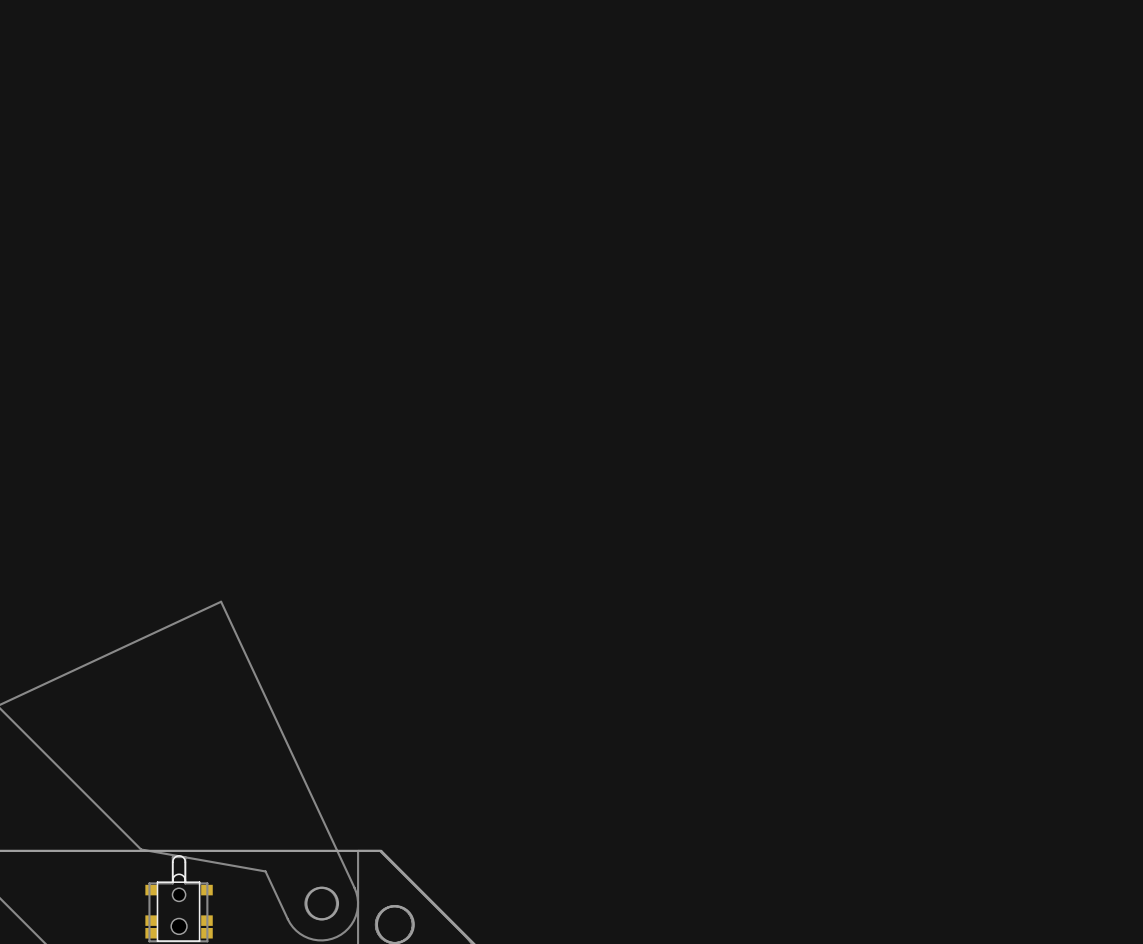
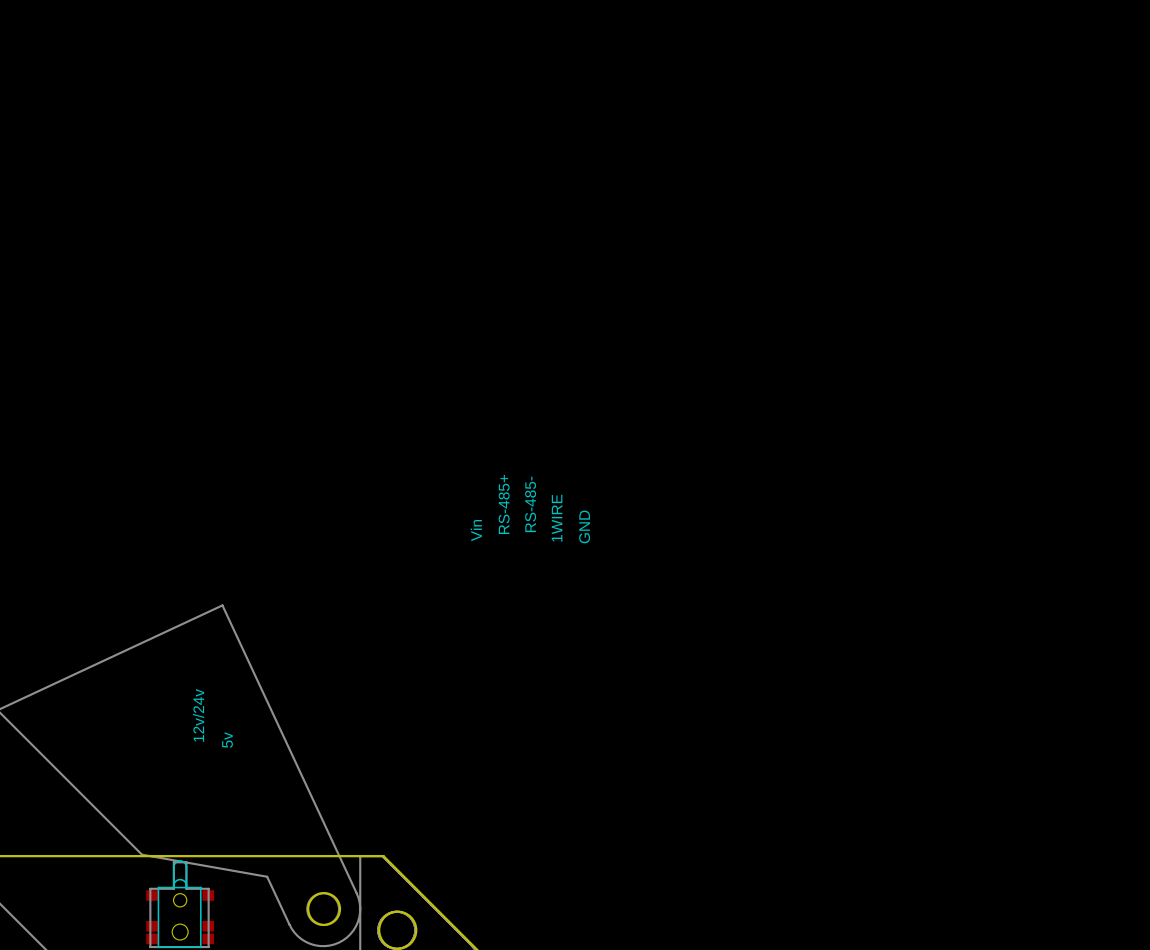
text: none -> RS-485+ (504, 504)
text: none -> RS-485- (530, 504)
text: none -> 1WIRE (557, 518)
text: none -> GND (584, 526)
text: none -> Vin (476, 530)
text: none -> 12v/24v (198, 715)
text: none -> 5v (227, 740)

